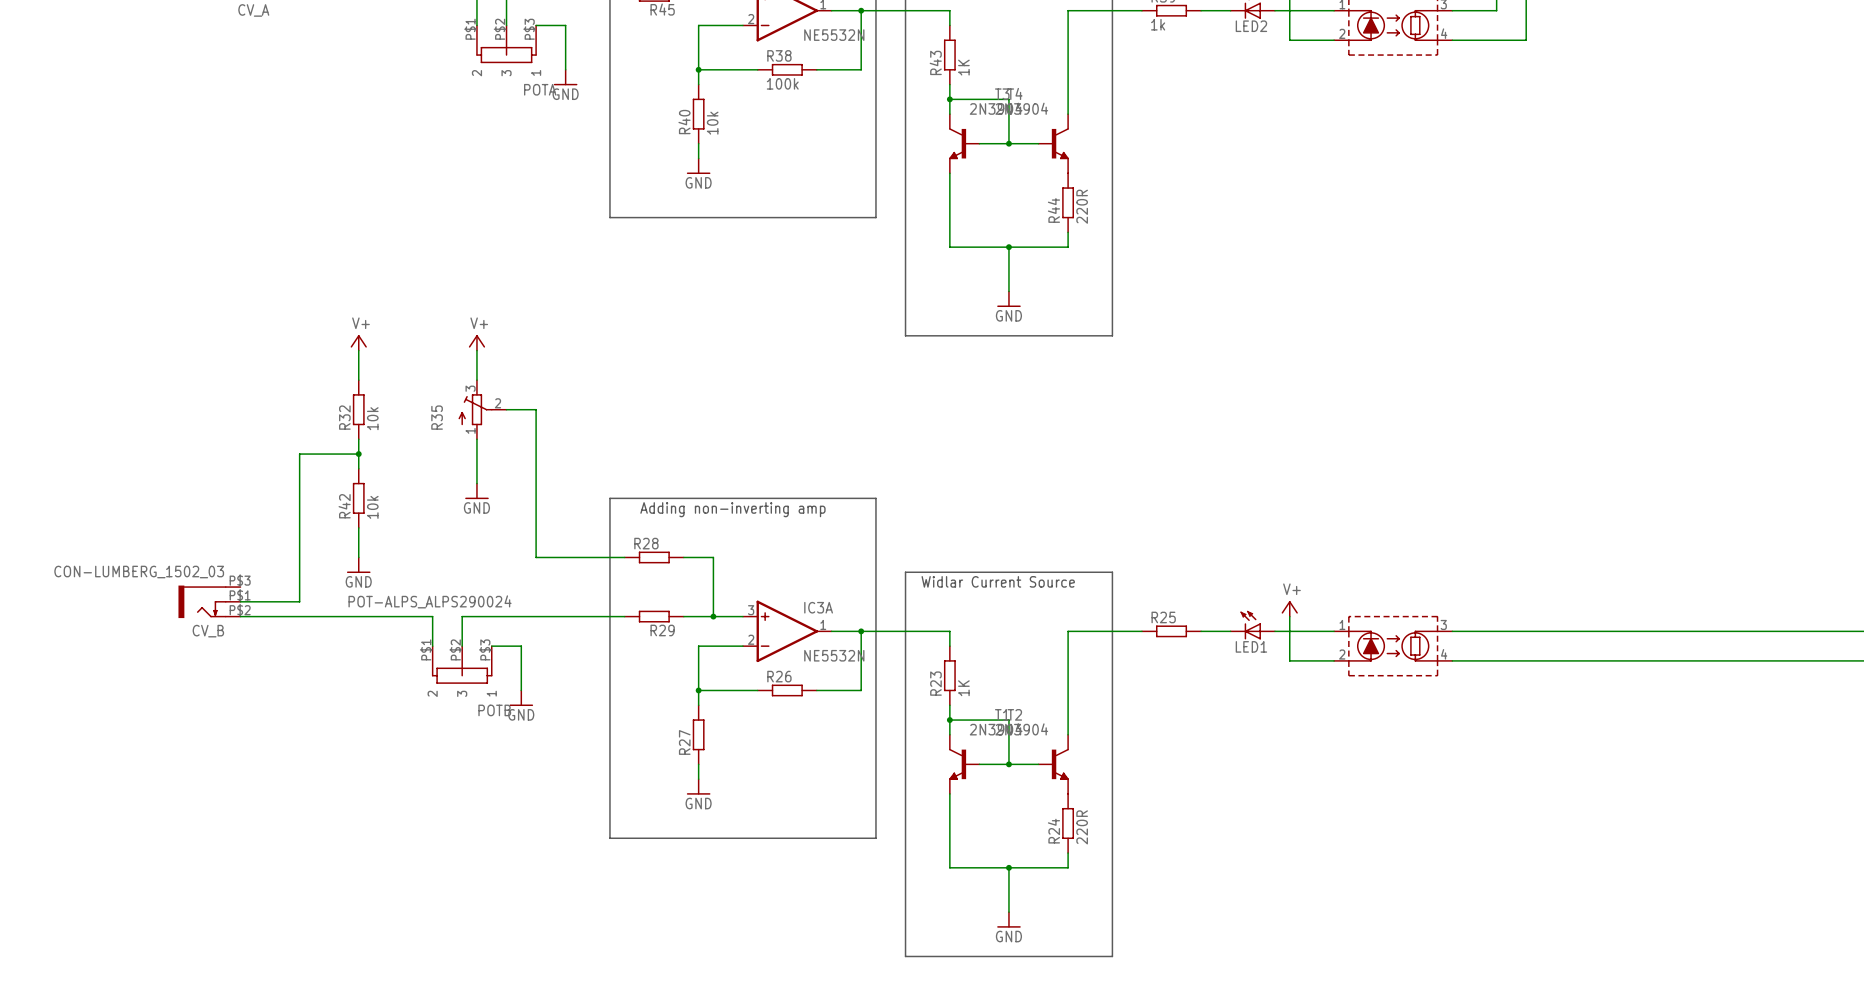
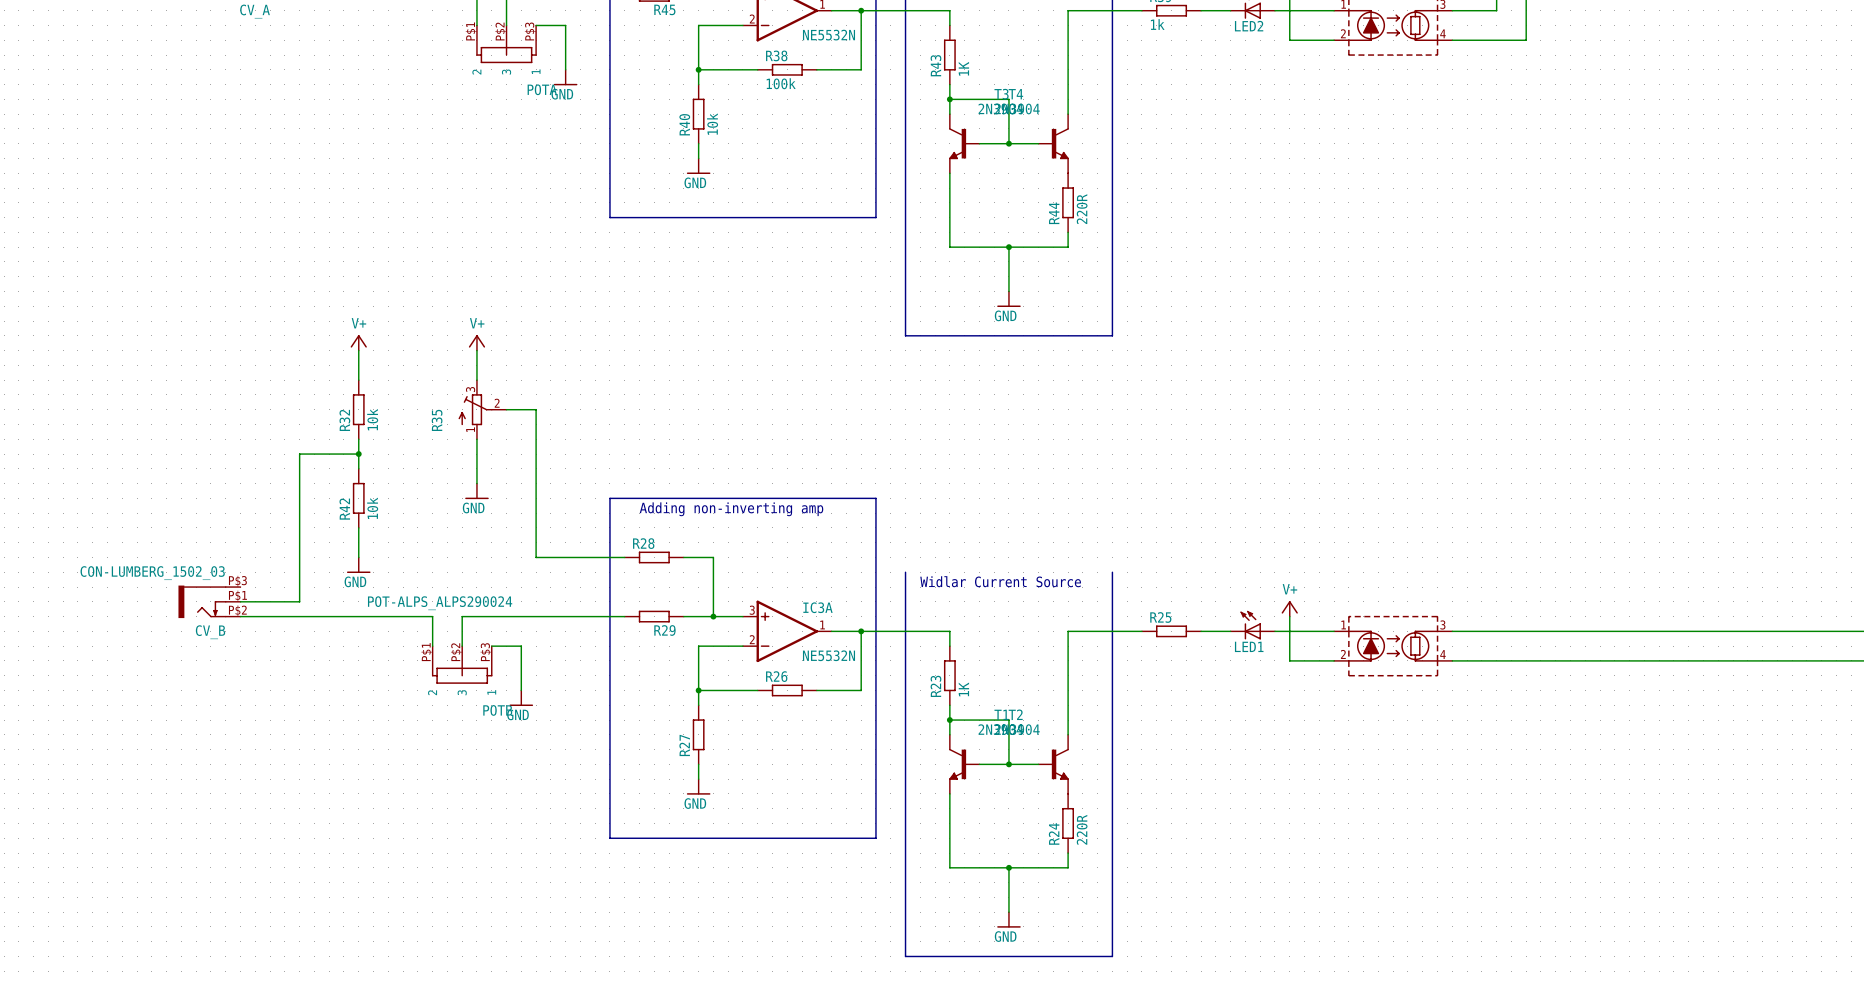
line: (905, 572) (1112, 572) -> none

